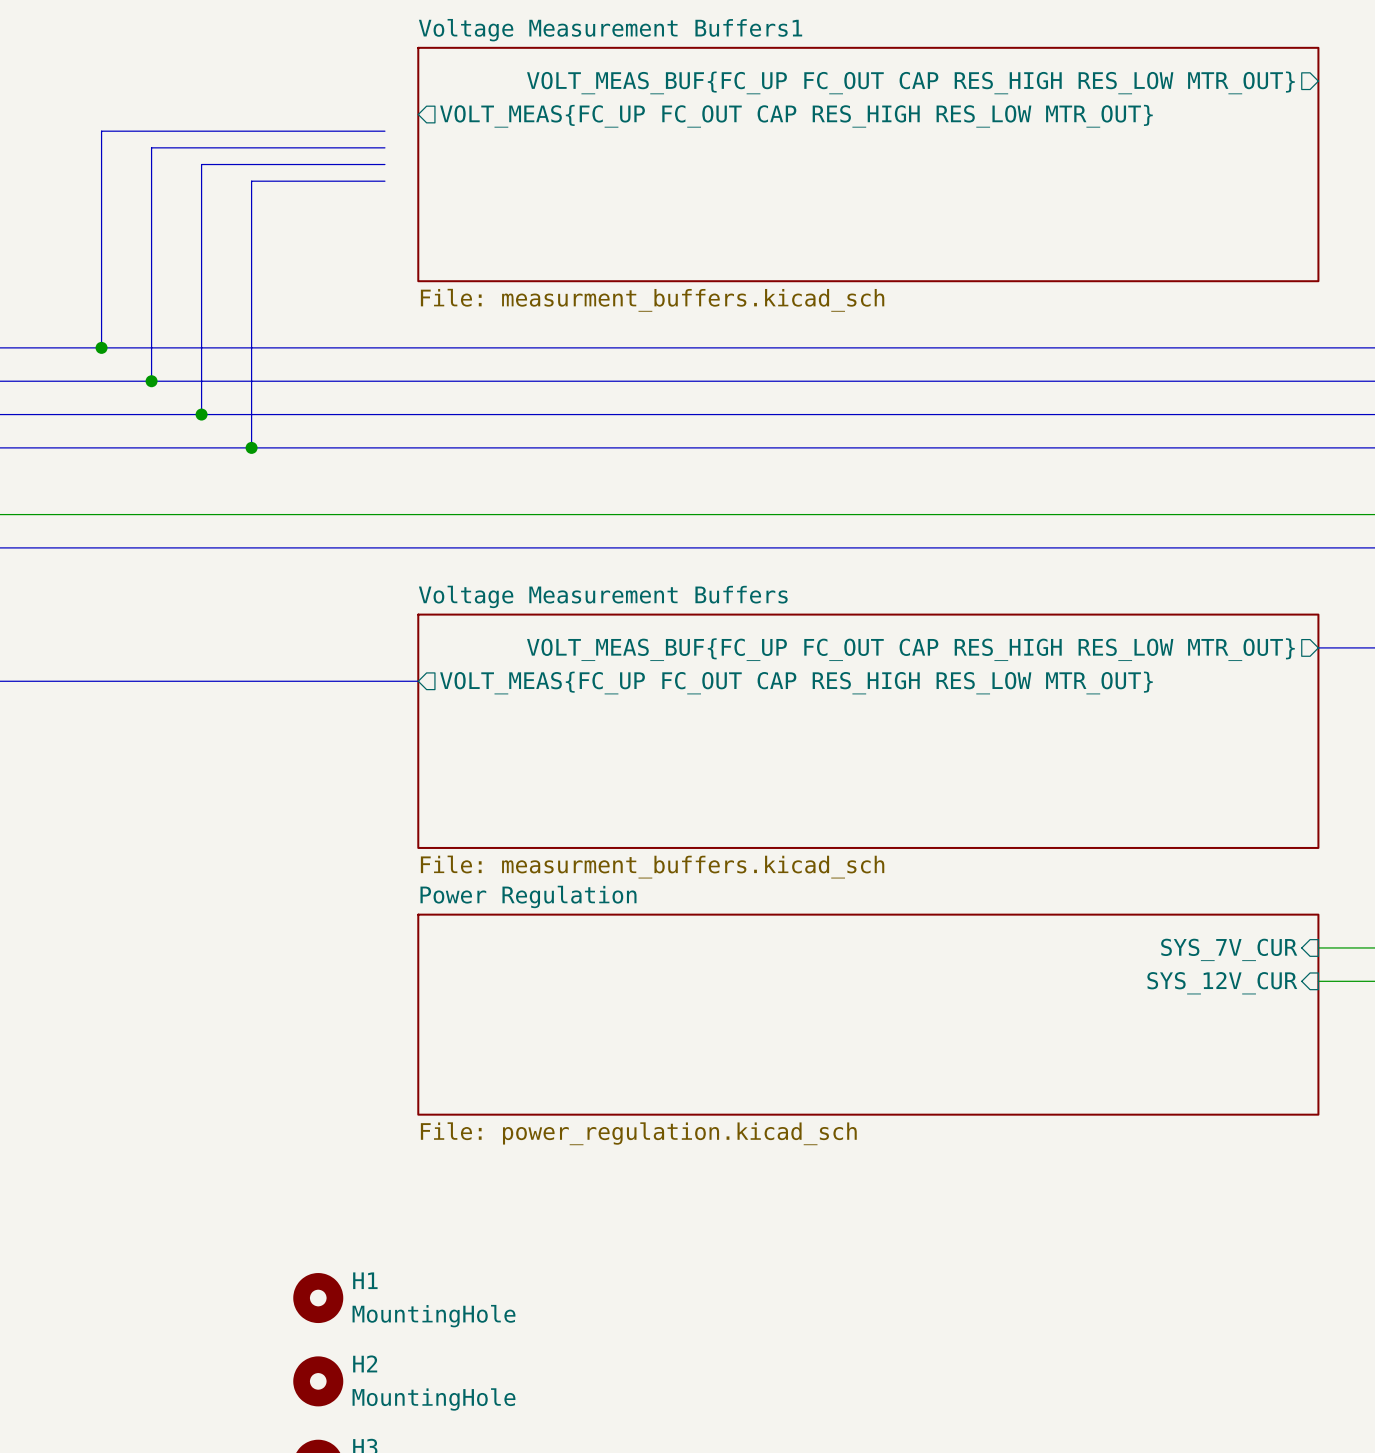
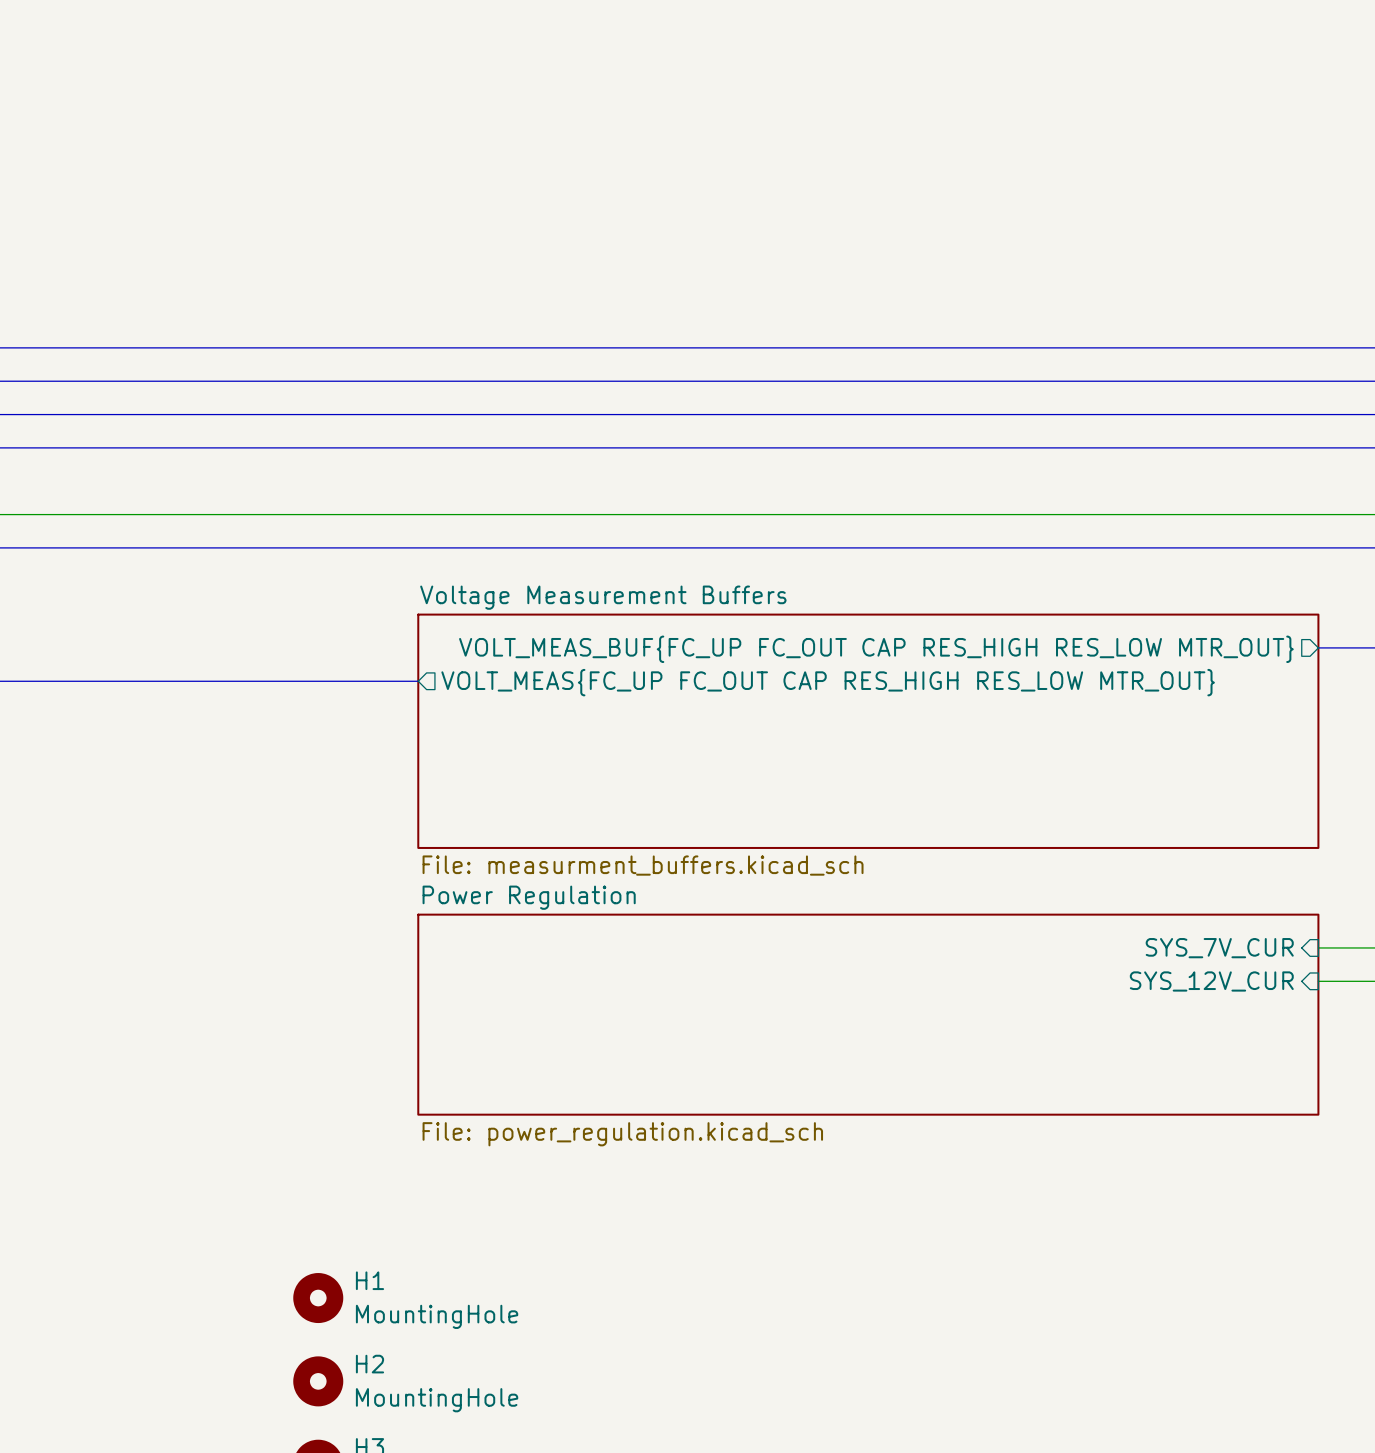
sheet pin: VOLT_MEAS_BUF{FC_UP FC_OUT CAP RES_HIGH RES_LOW MTR_OUT} (910, 82) -> none
sheet pin: VOLT_MEAS{FC_UP FC_OUT CAP RES_HIGH RES_LOW MTR_OUT} (796, 116) -> none
bus: (384, 131) (101, 131) (101, 347) -> none
bus: (384, 147) (151, 147) (151, 381) -> none
bus: (384, 164) (201, 164) (201, 414) -> none
sheet Voltage Measurement Buffers1: File: measurment_buffers.kicad_sch (868, 164) -> none
bus: (384, 181) (251, 181) (251, 447) -> none
junction: (101, 347) -> none
junction: (151, 381) -> none
junction: (201, 414) -> none
junction: (251, 447) -> none

